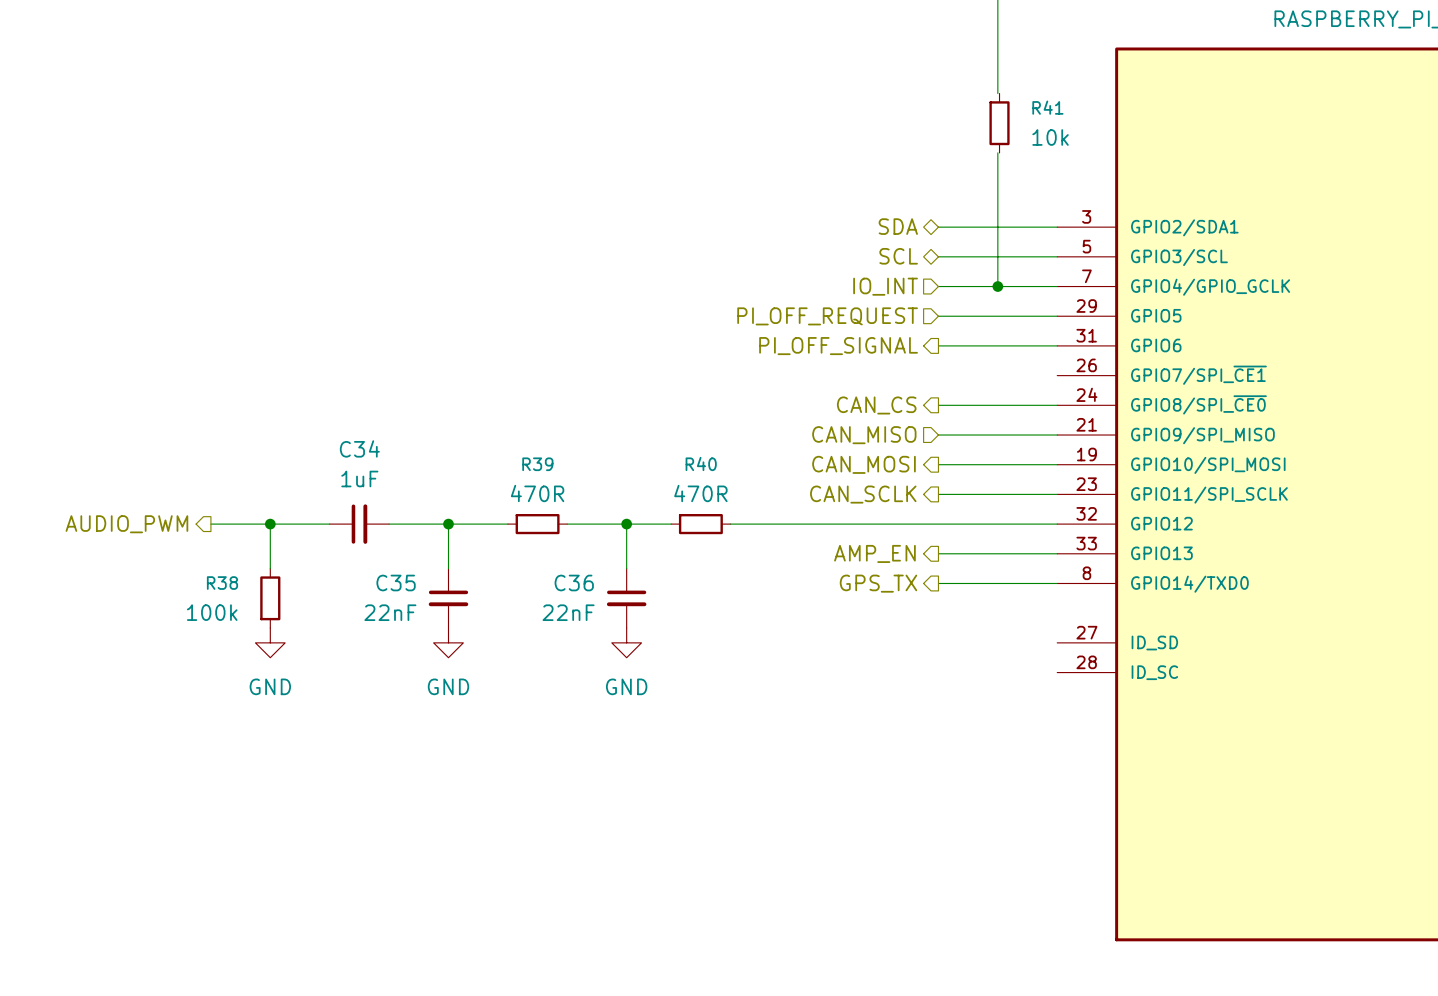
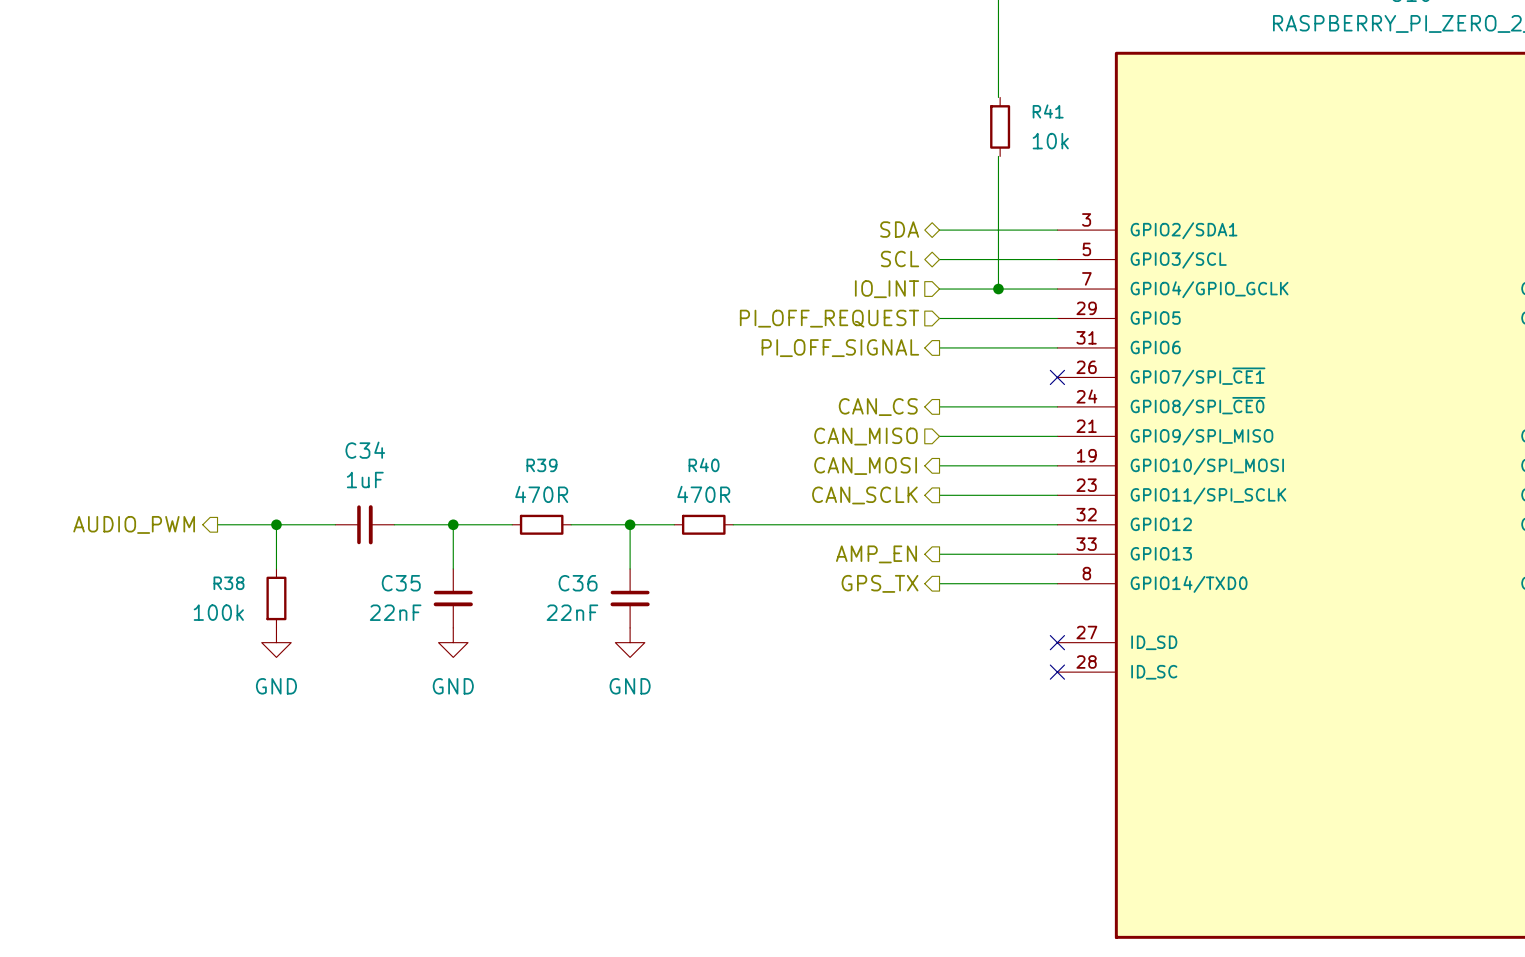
no-connect mark: none -> (1057, 377)
no-connect mark: none -> (1057, 642)
no-connect mark: none -> (1057, 672)

